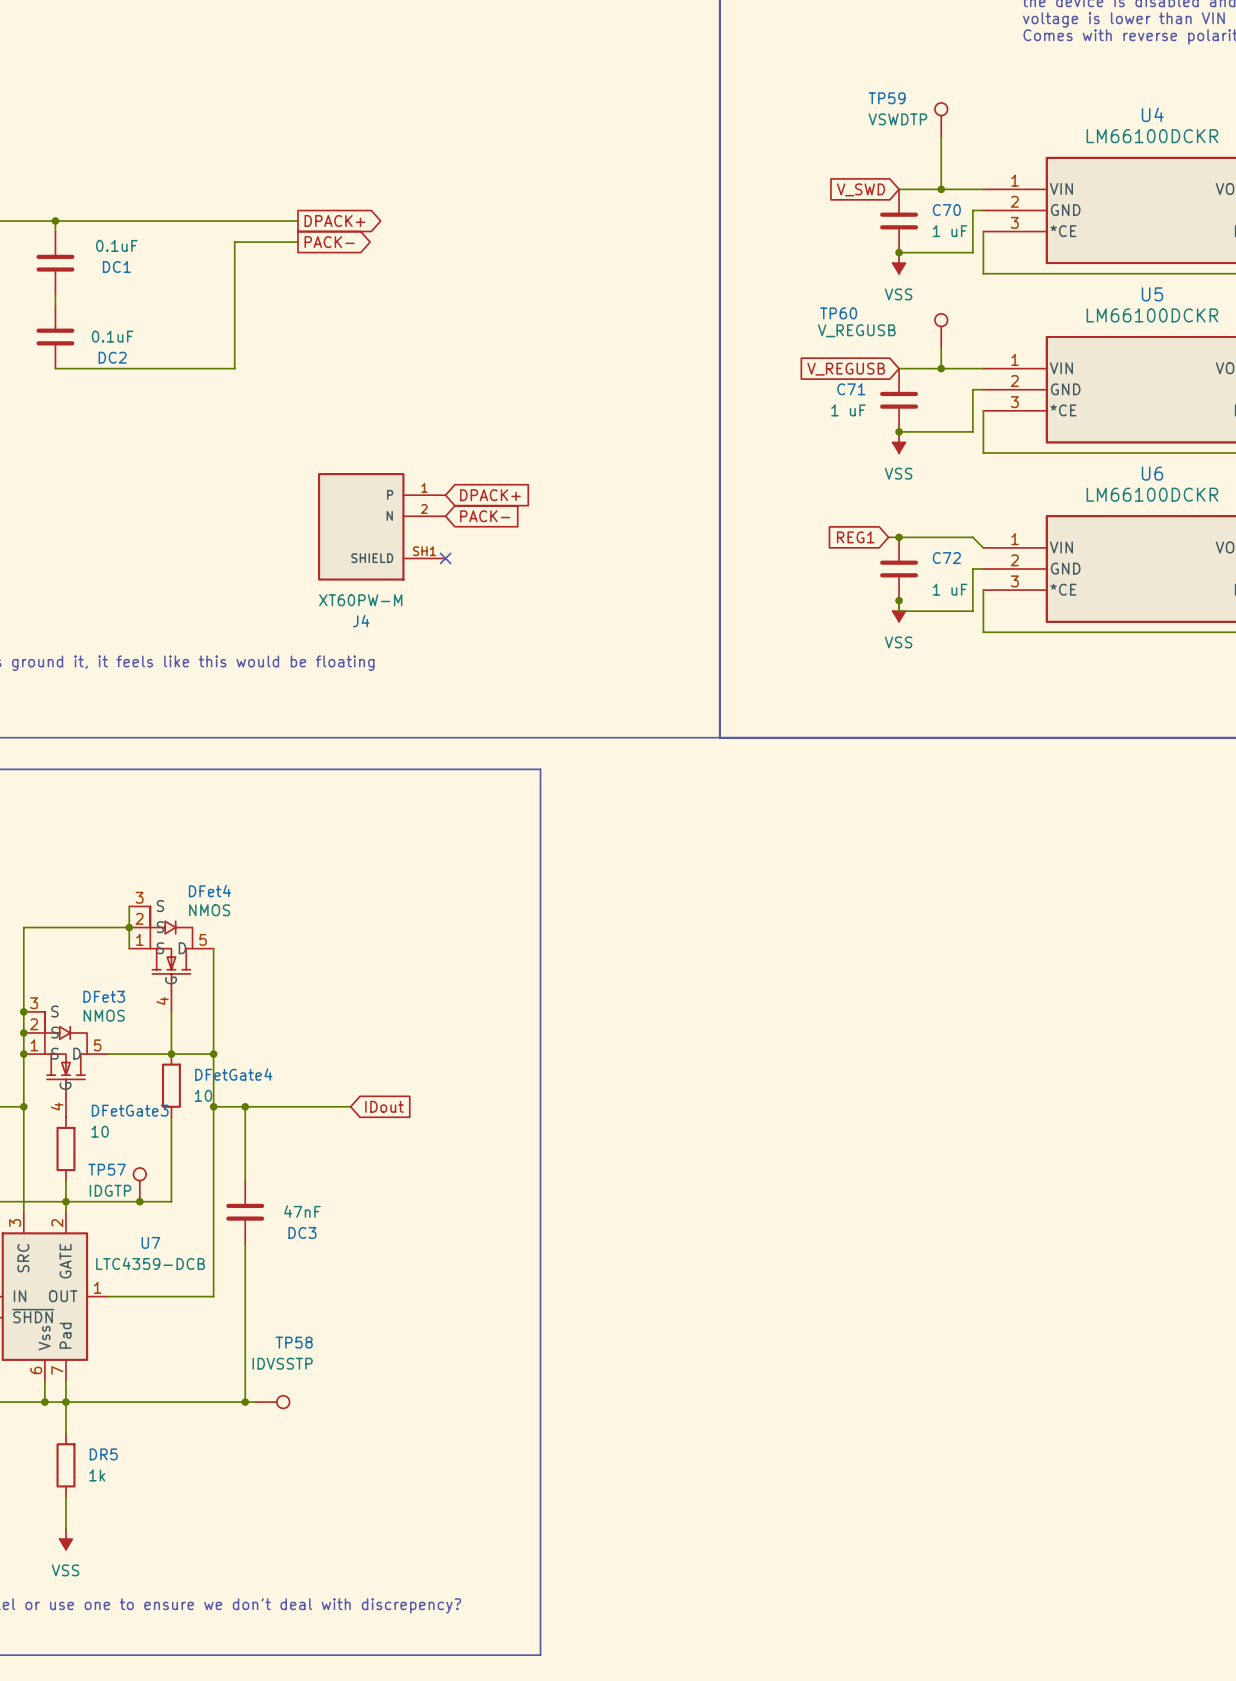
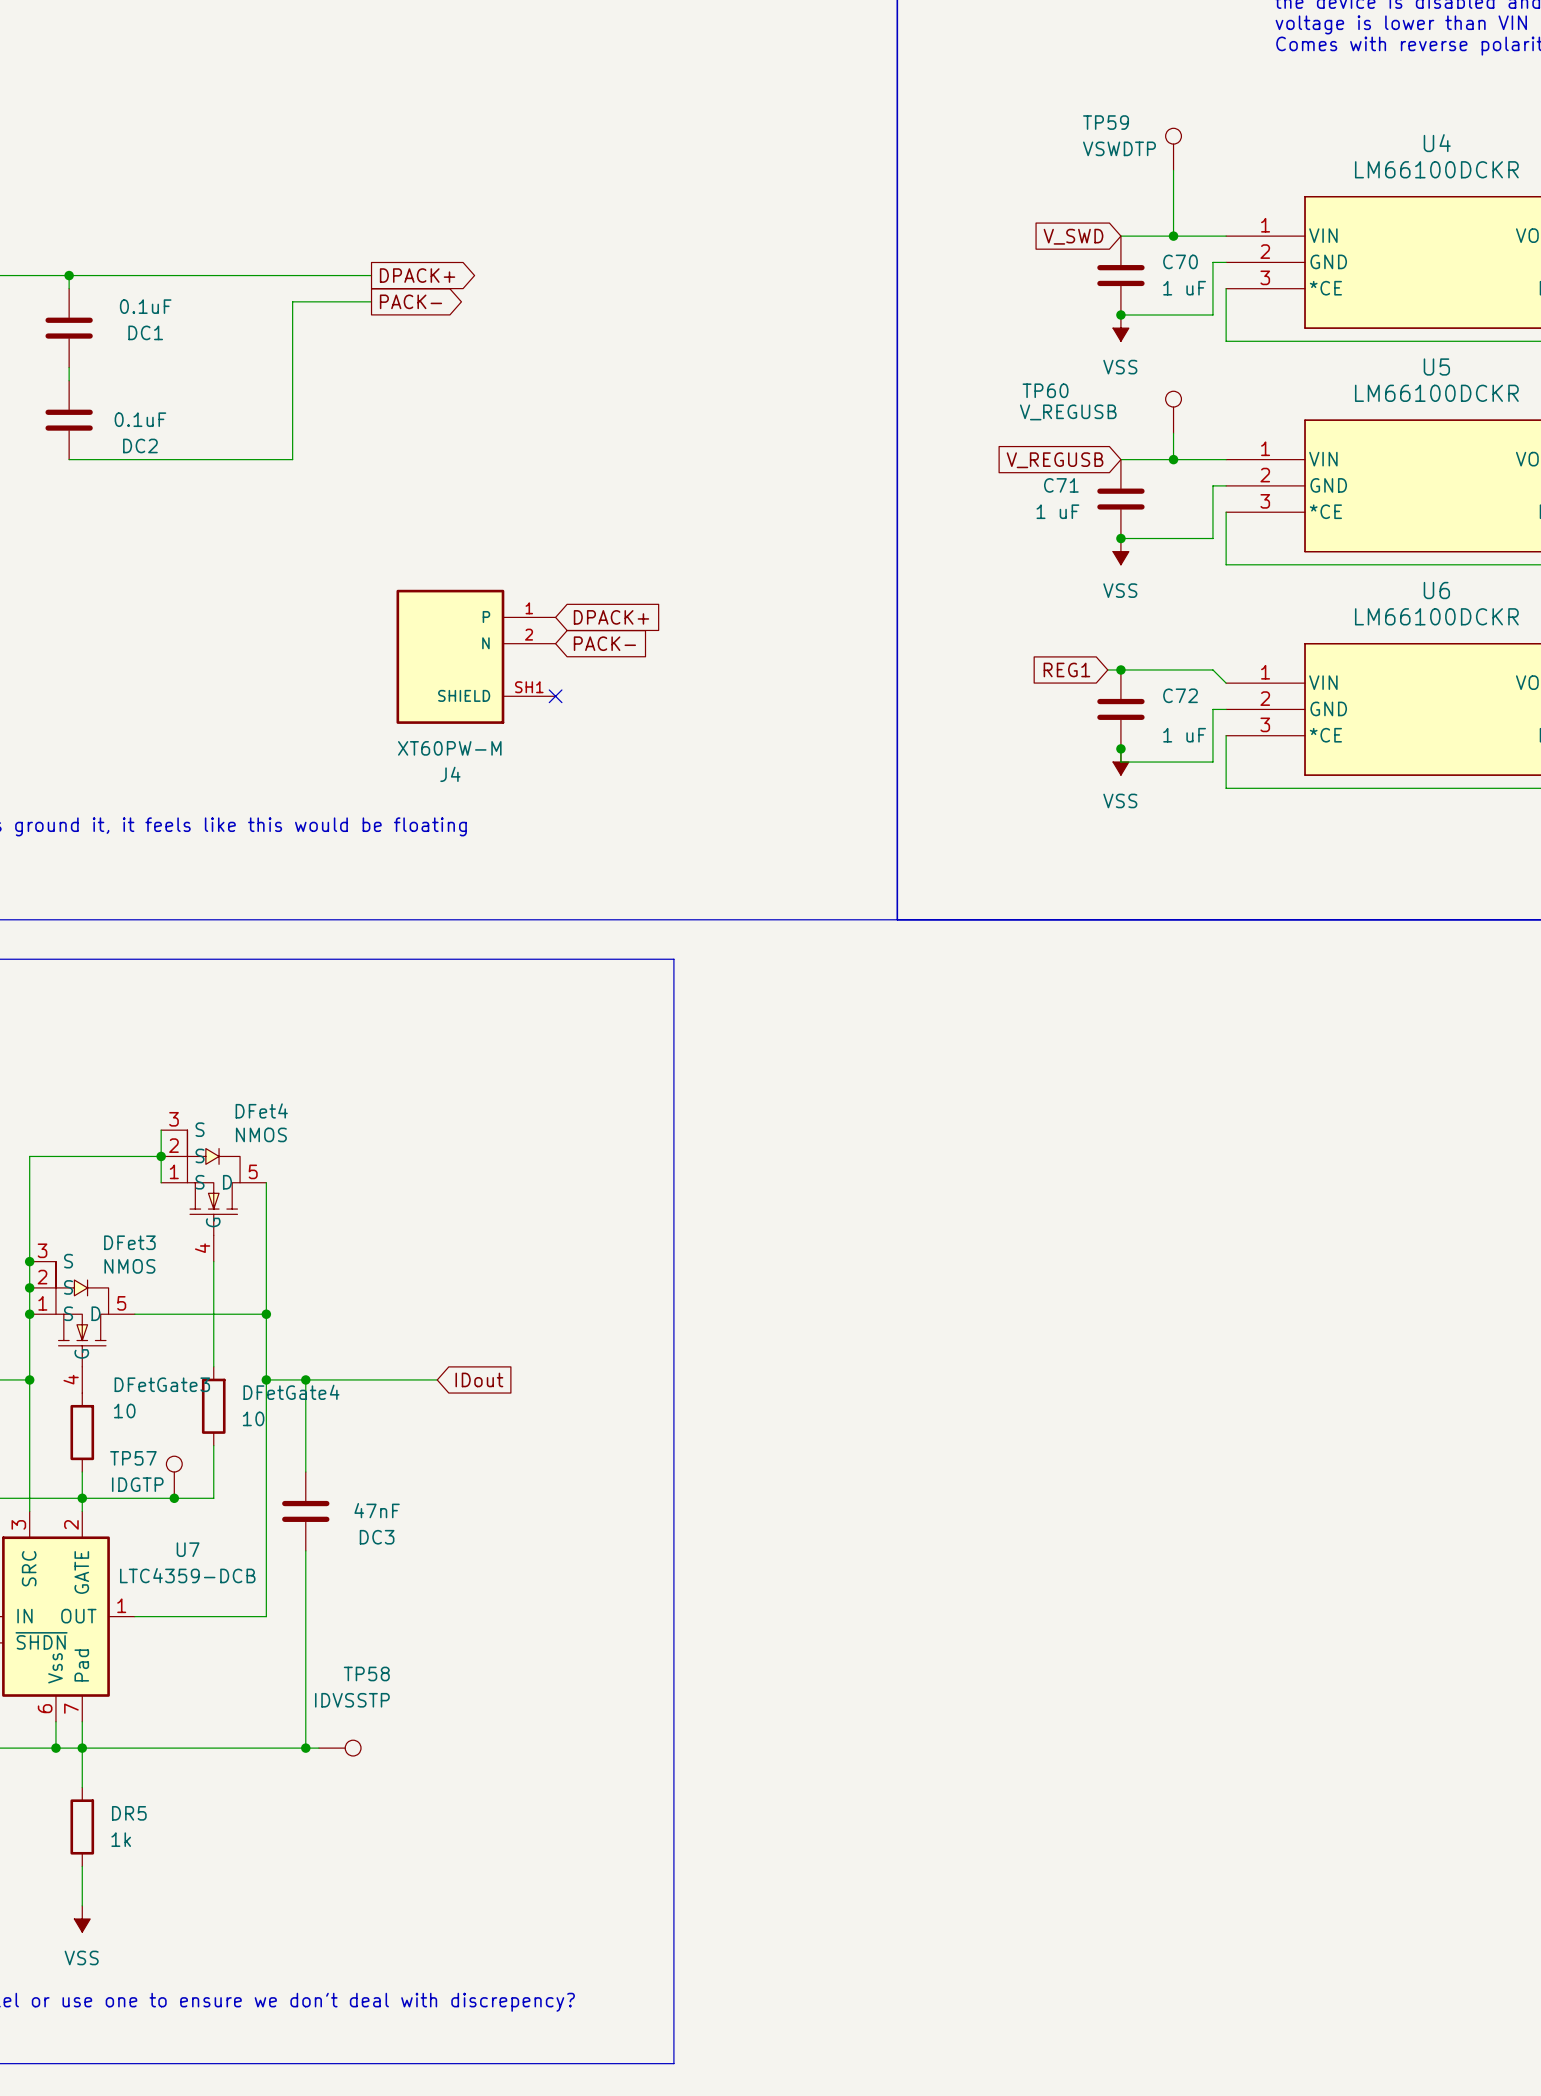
junction: (171, 1054) -> none
DFetGate4 position: (171, 1085) -> (213, 1406)
wire: (171, 1117) (171, 1159) -> (213, 1314) (213, 1366)

